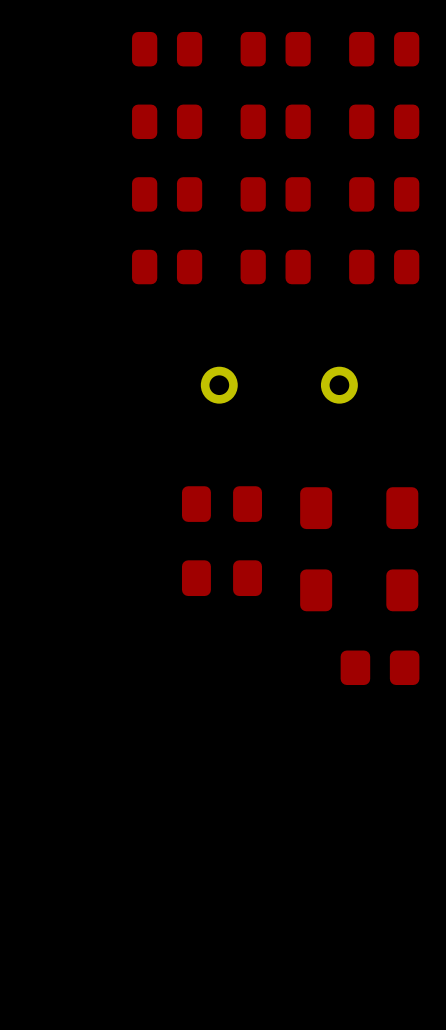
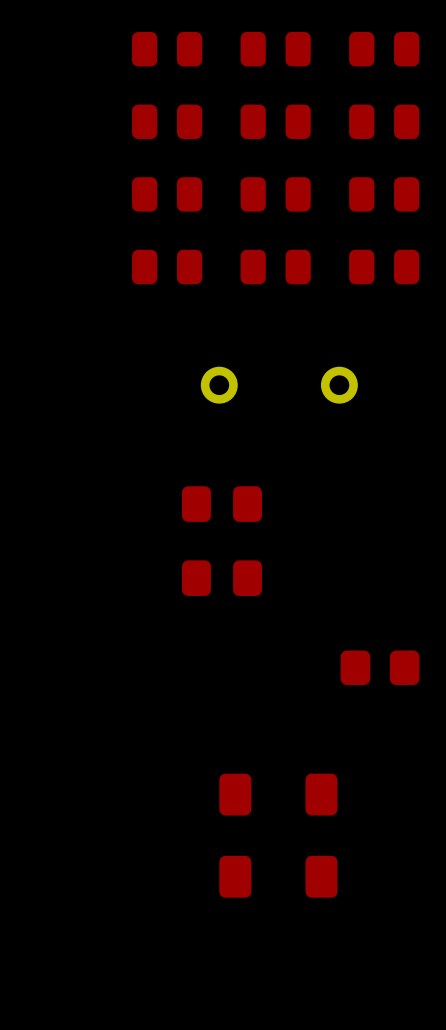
part: (359, 508) -> none
part: (359, 590) -> none
part: none -> (278, 794)
part: none -> (278, 876)

